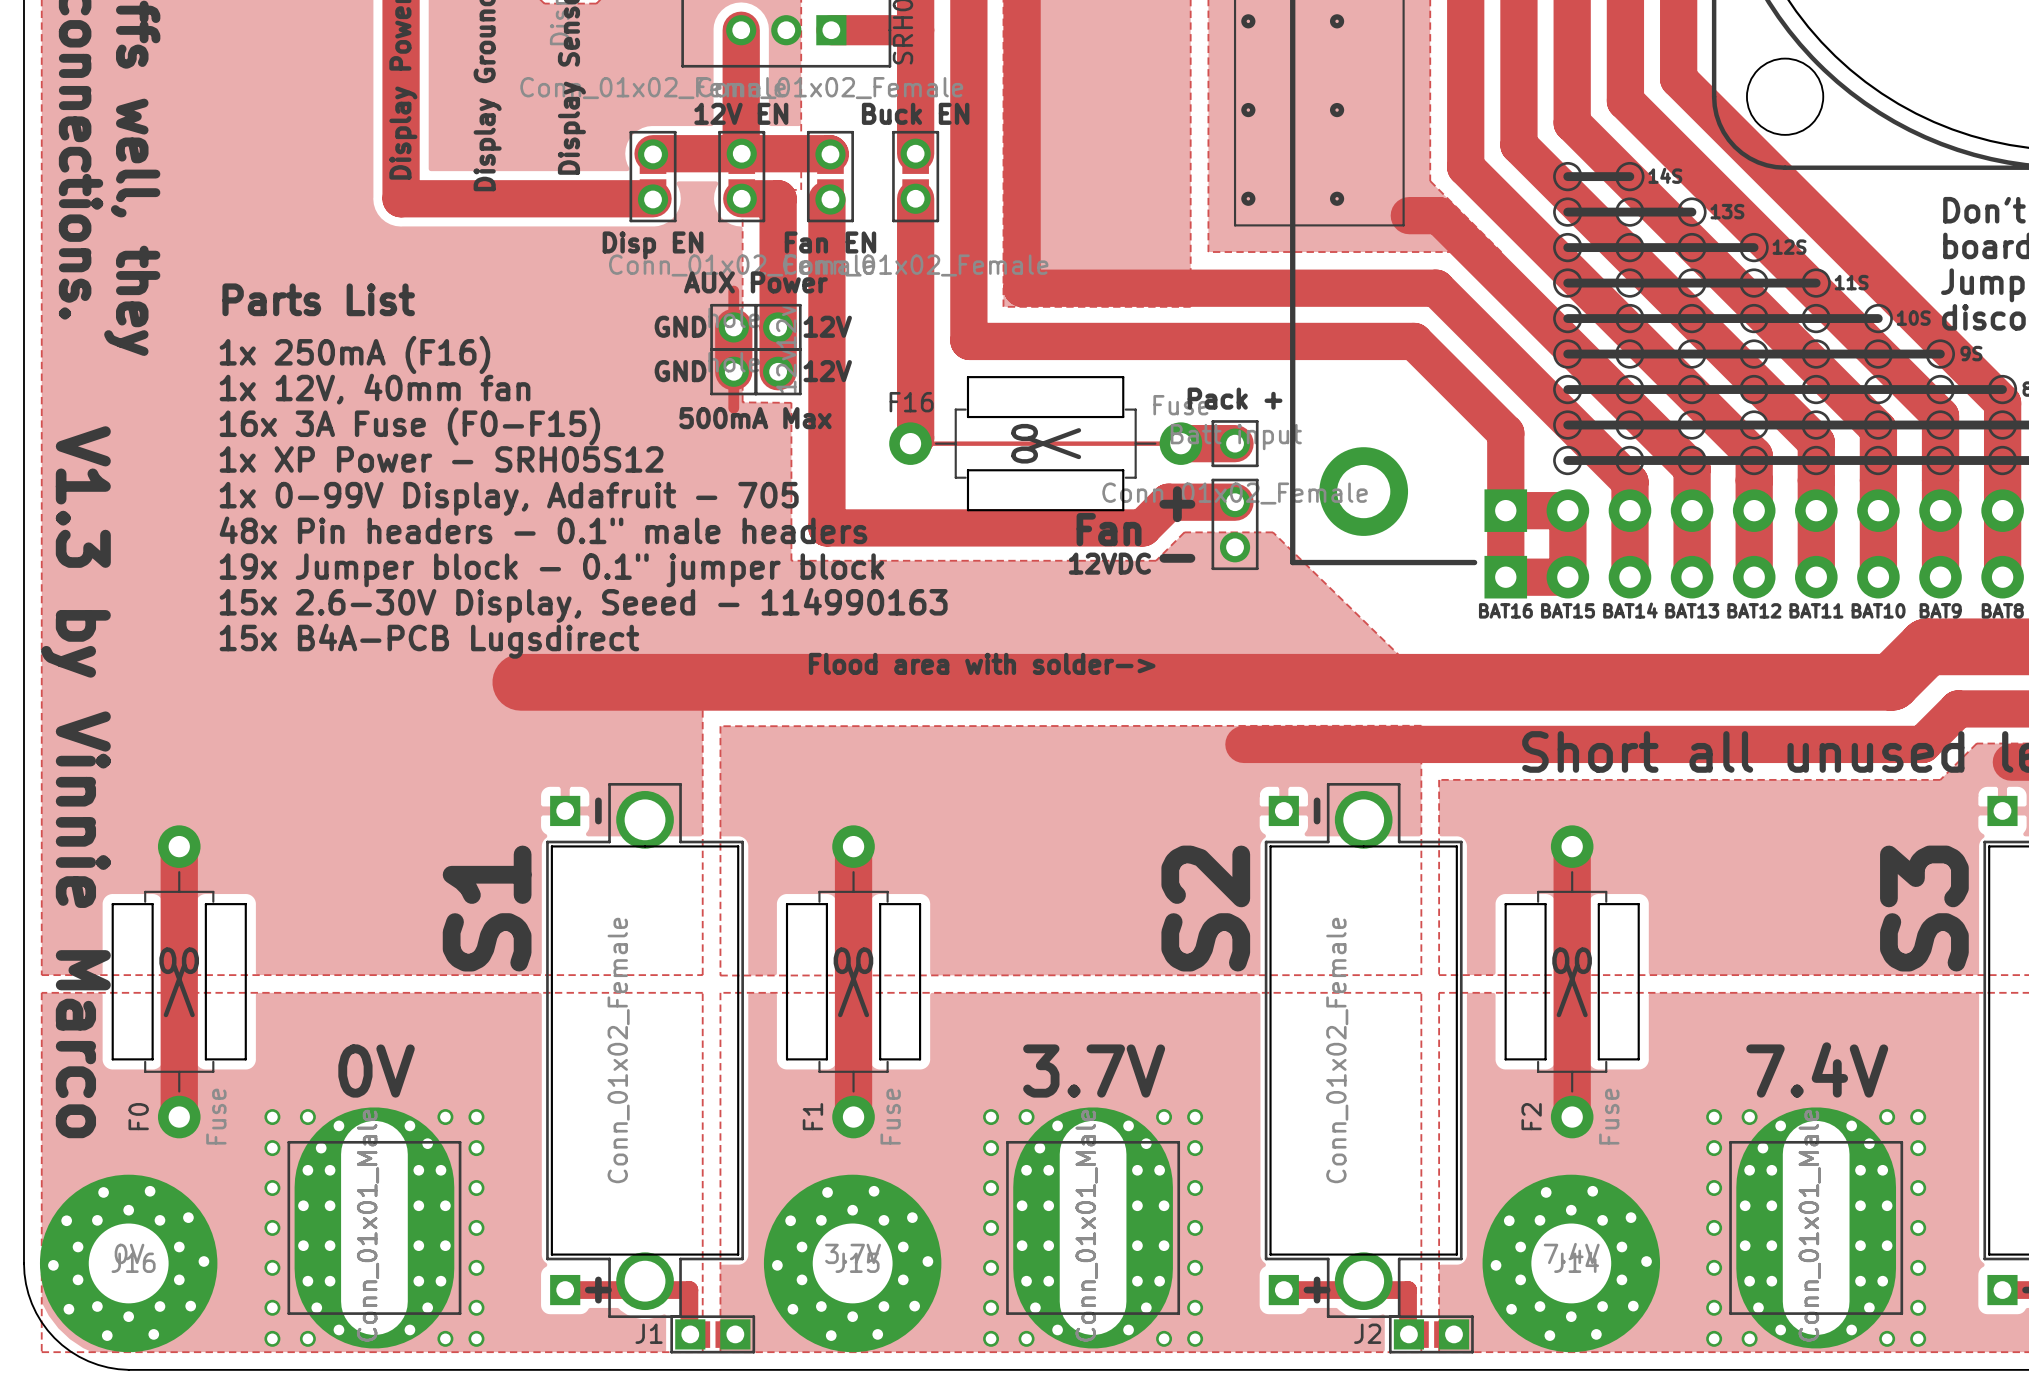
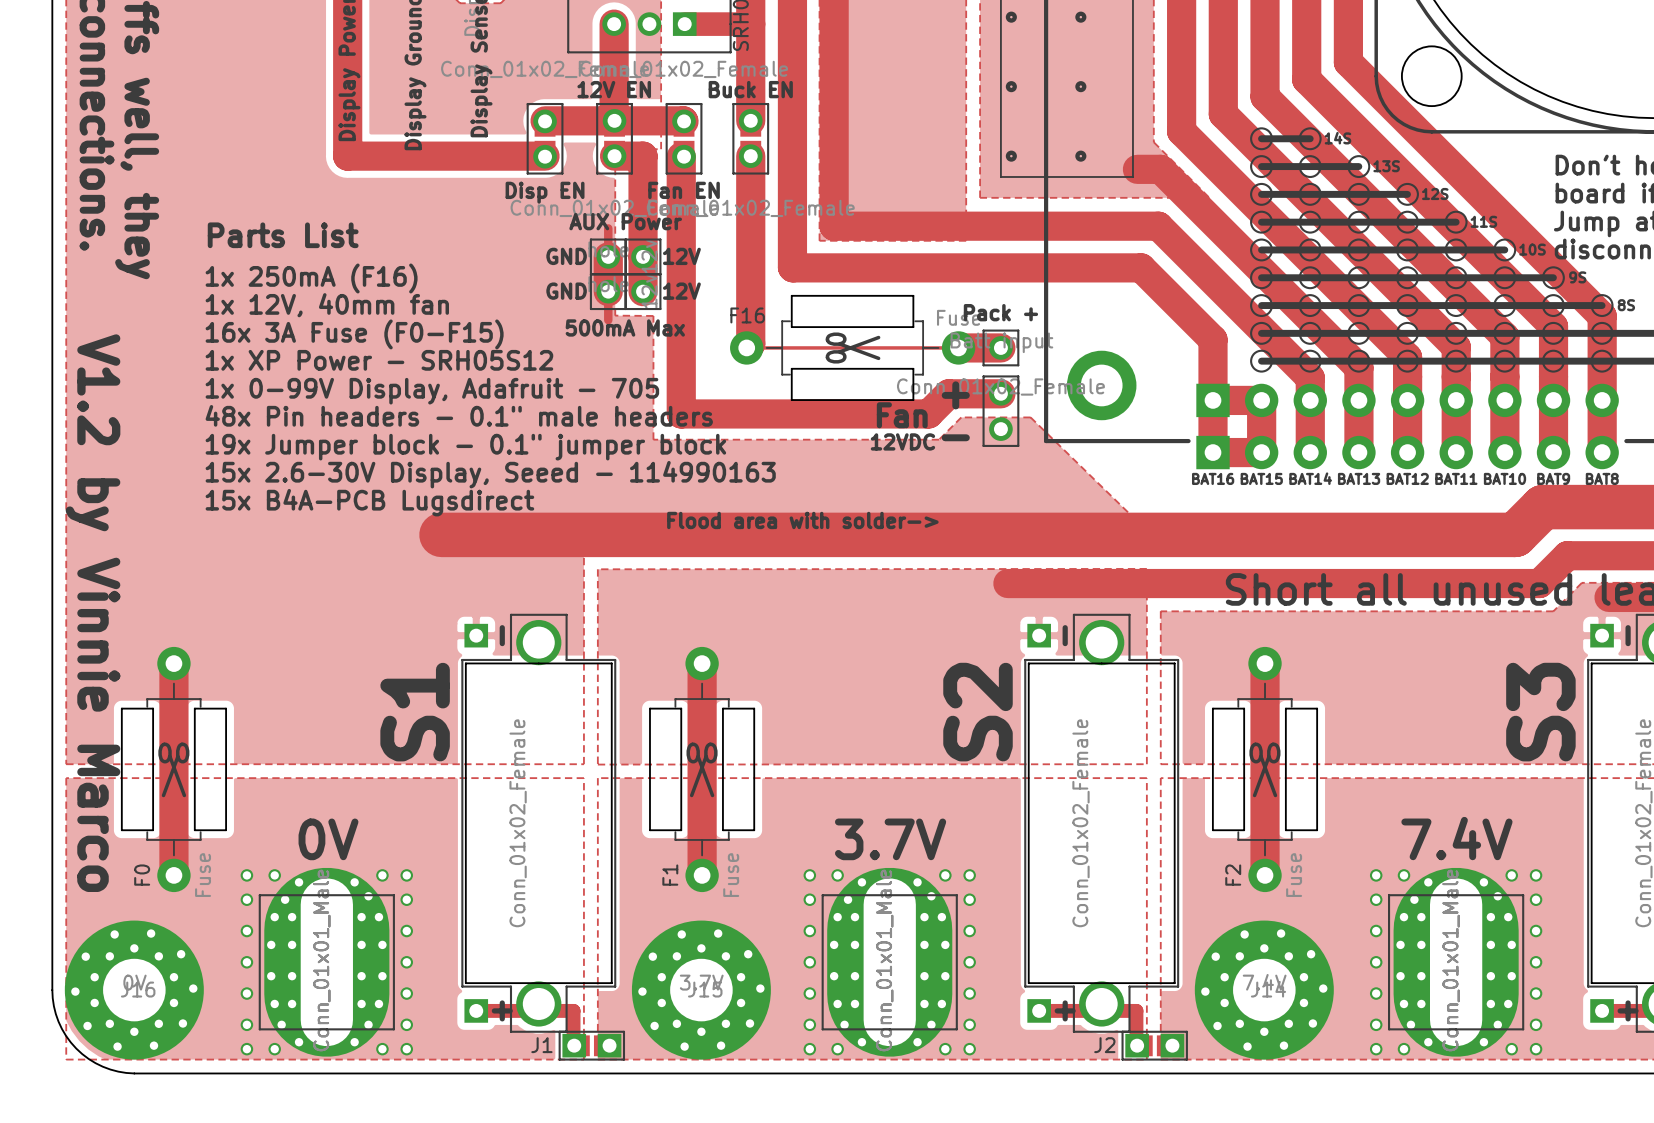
text: V1.3 by Vinnie Marco (75, 782) -> V1.2 by Vinnie Marco (93, 613)

